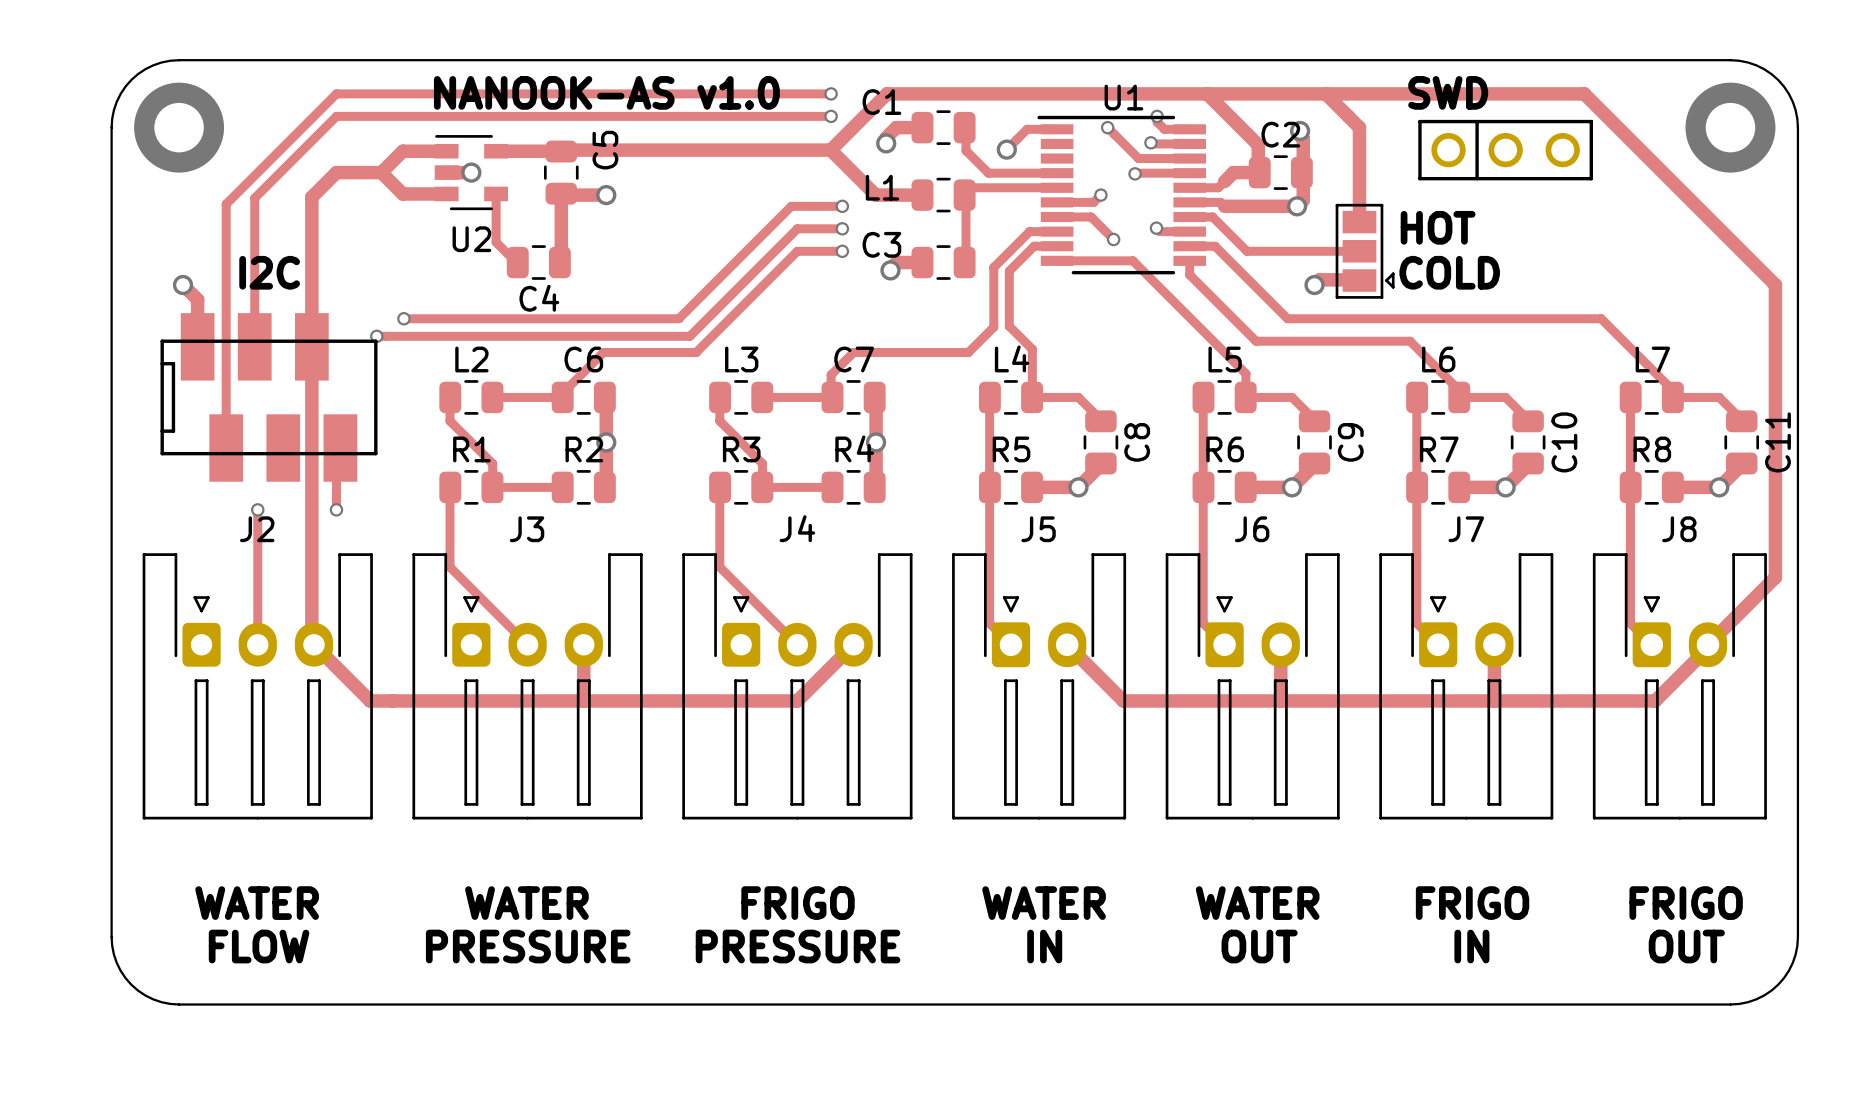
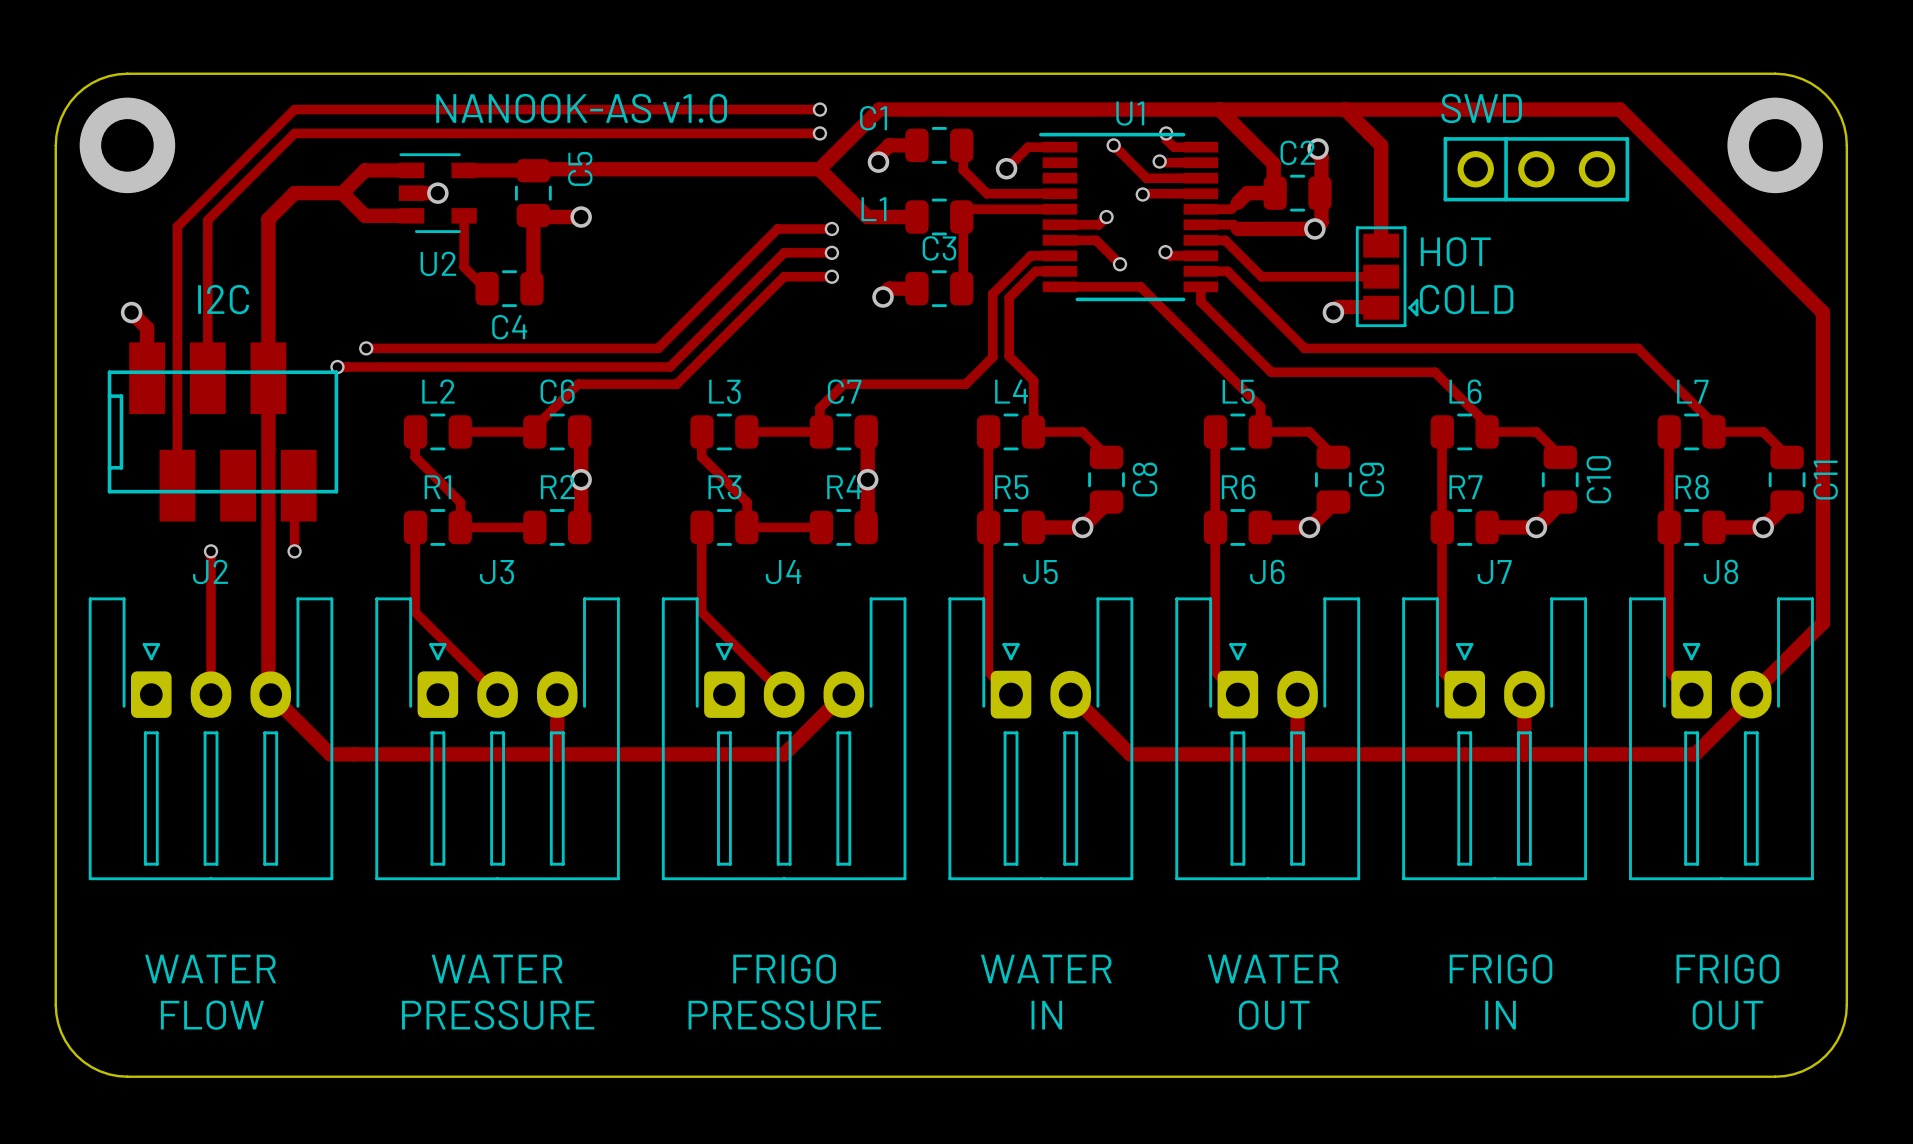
C3 name position: C3 (881, 244) -> C3 (939, 248)

